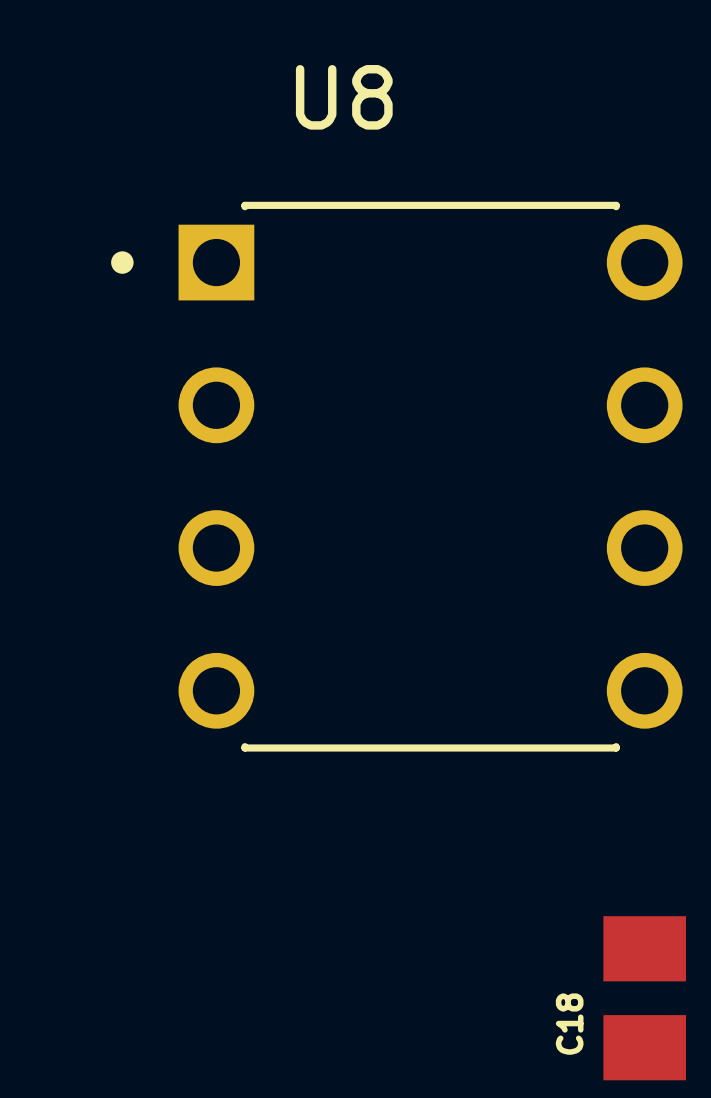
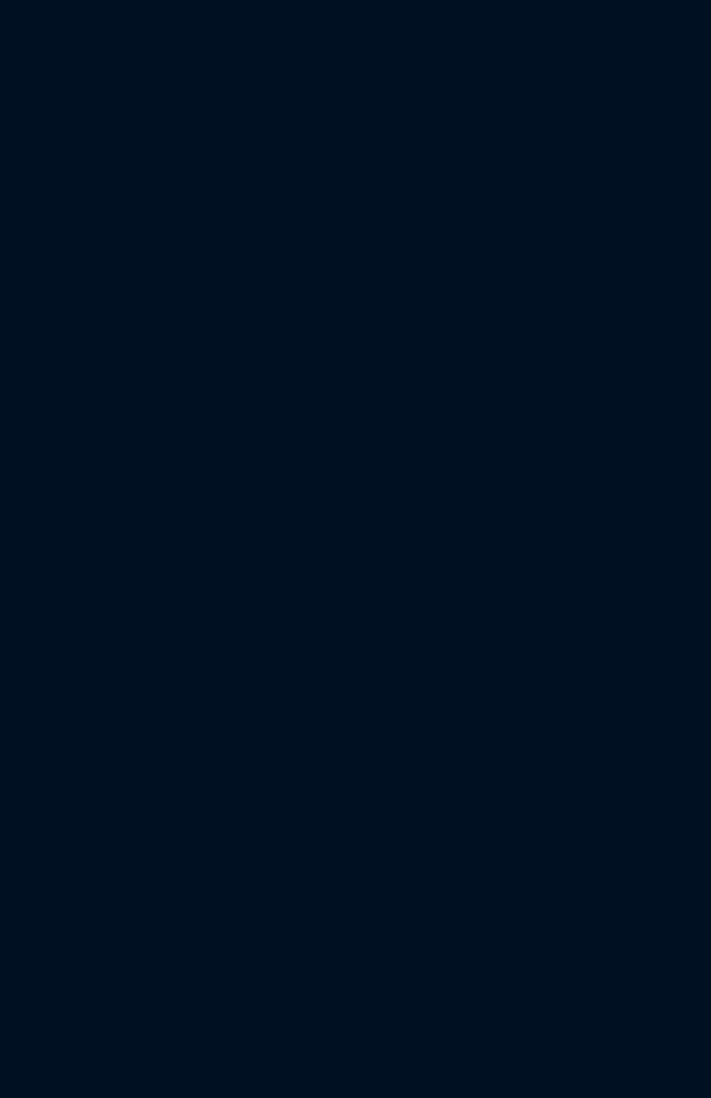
U8: (396, 476) -> none
C18: (644, 998) -> none

